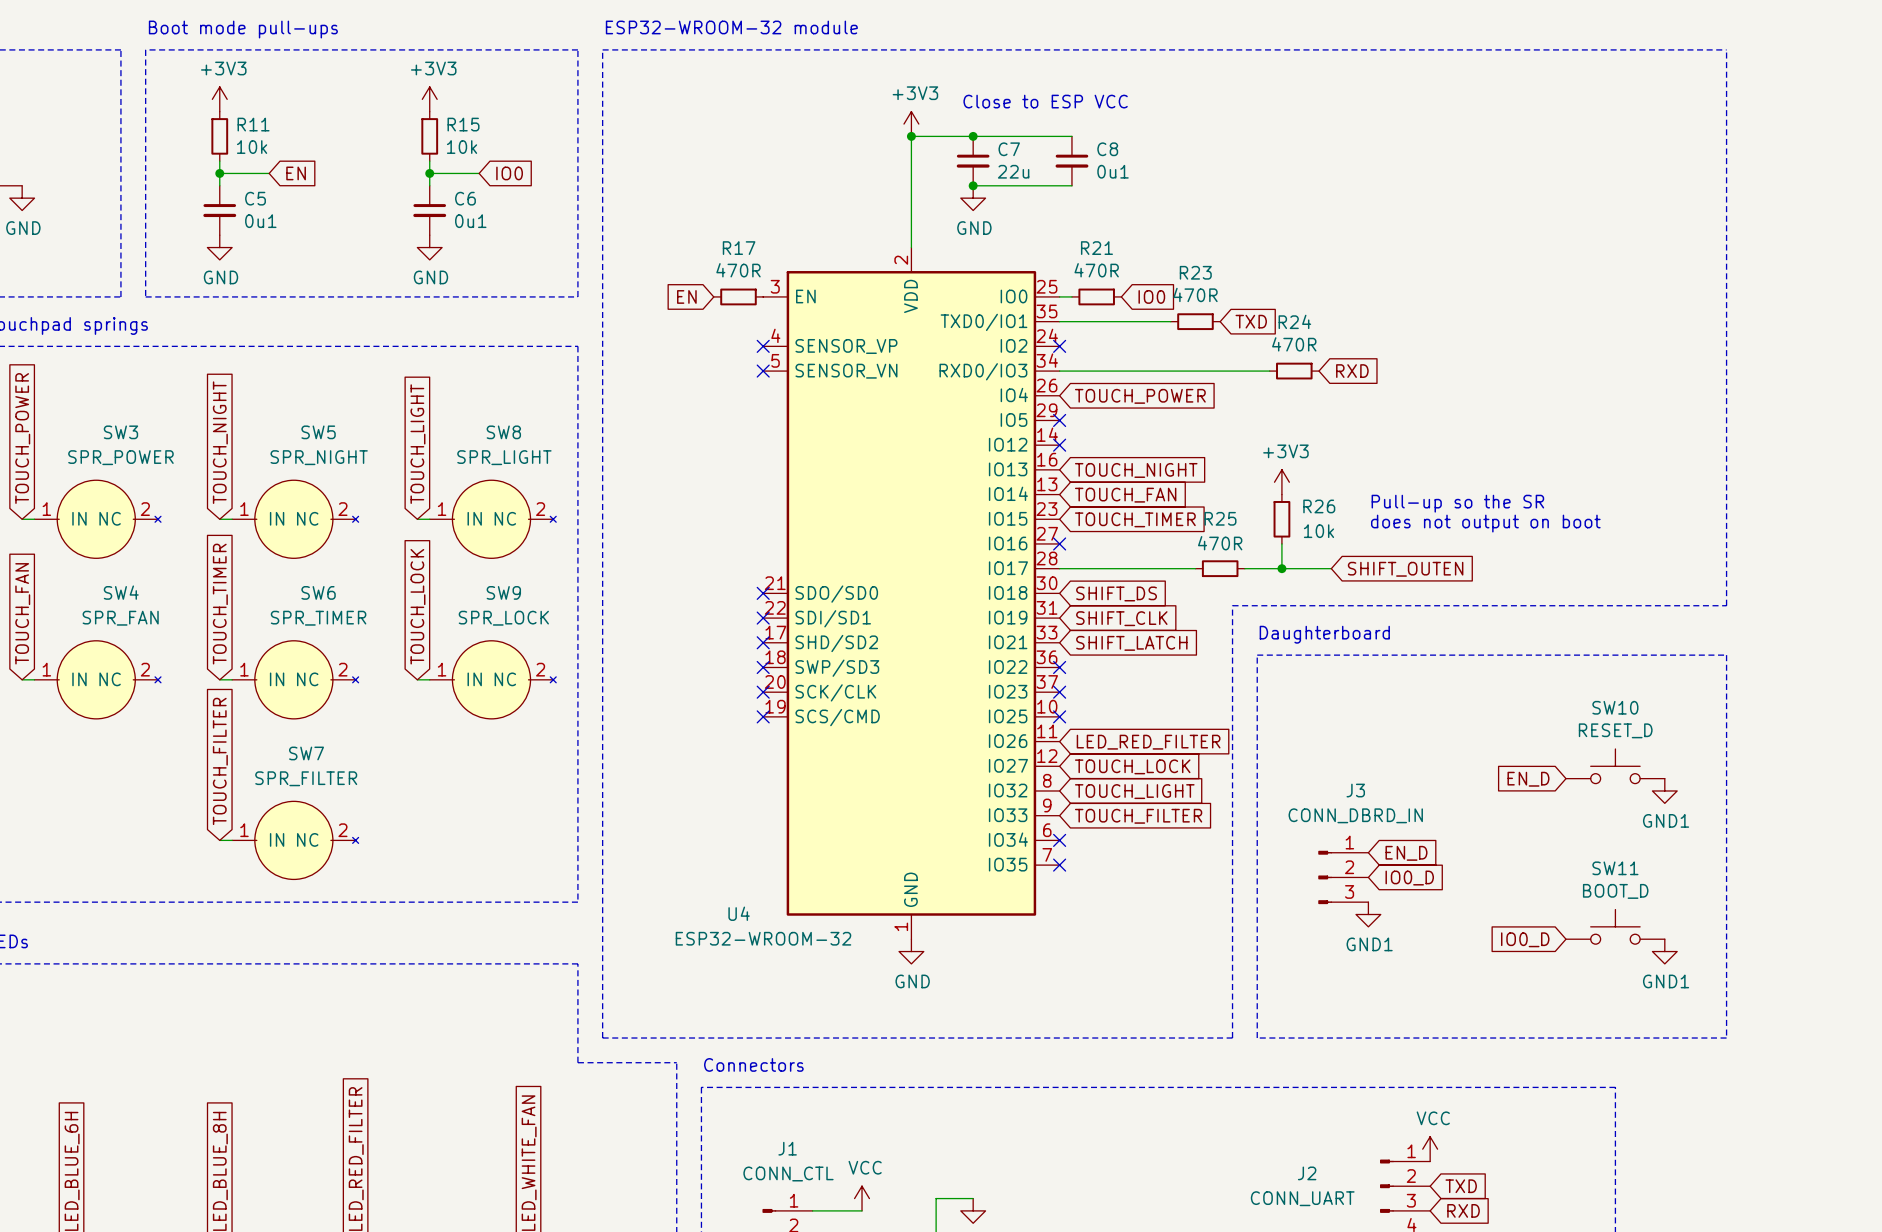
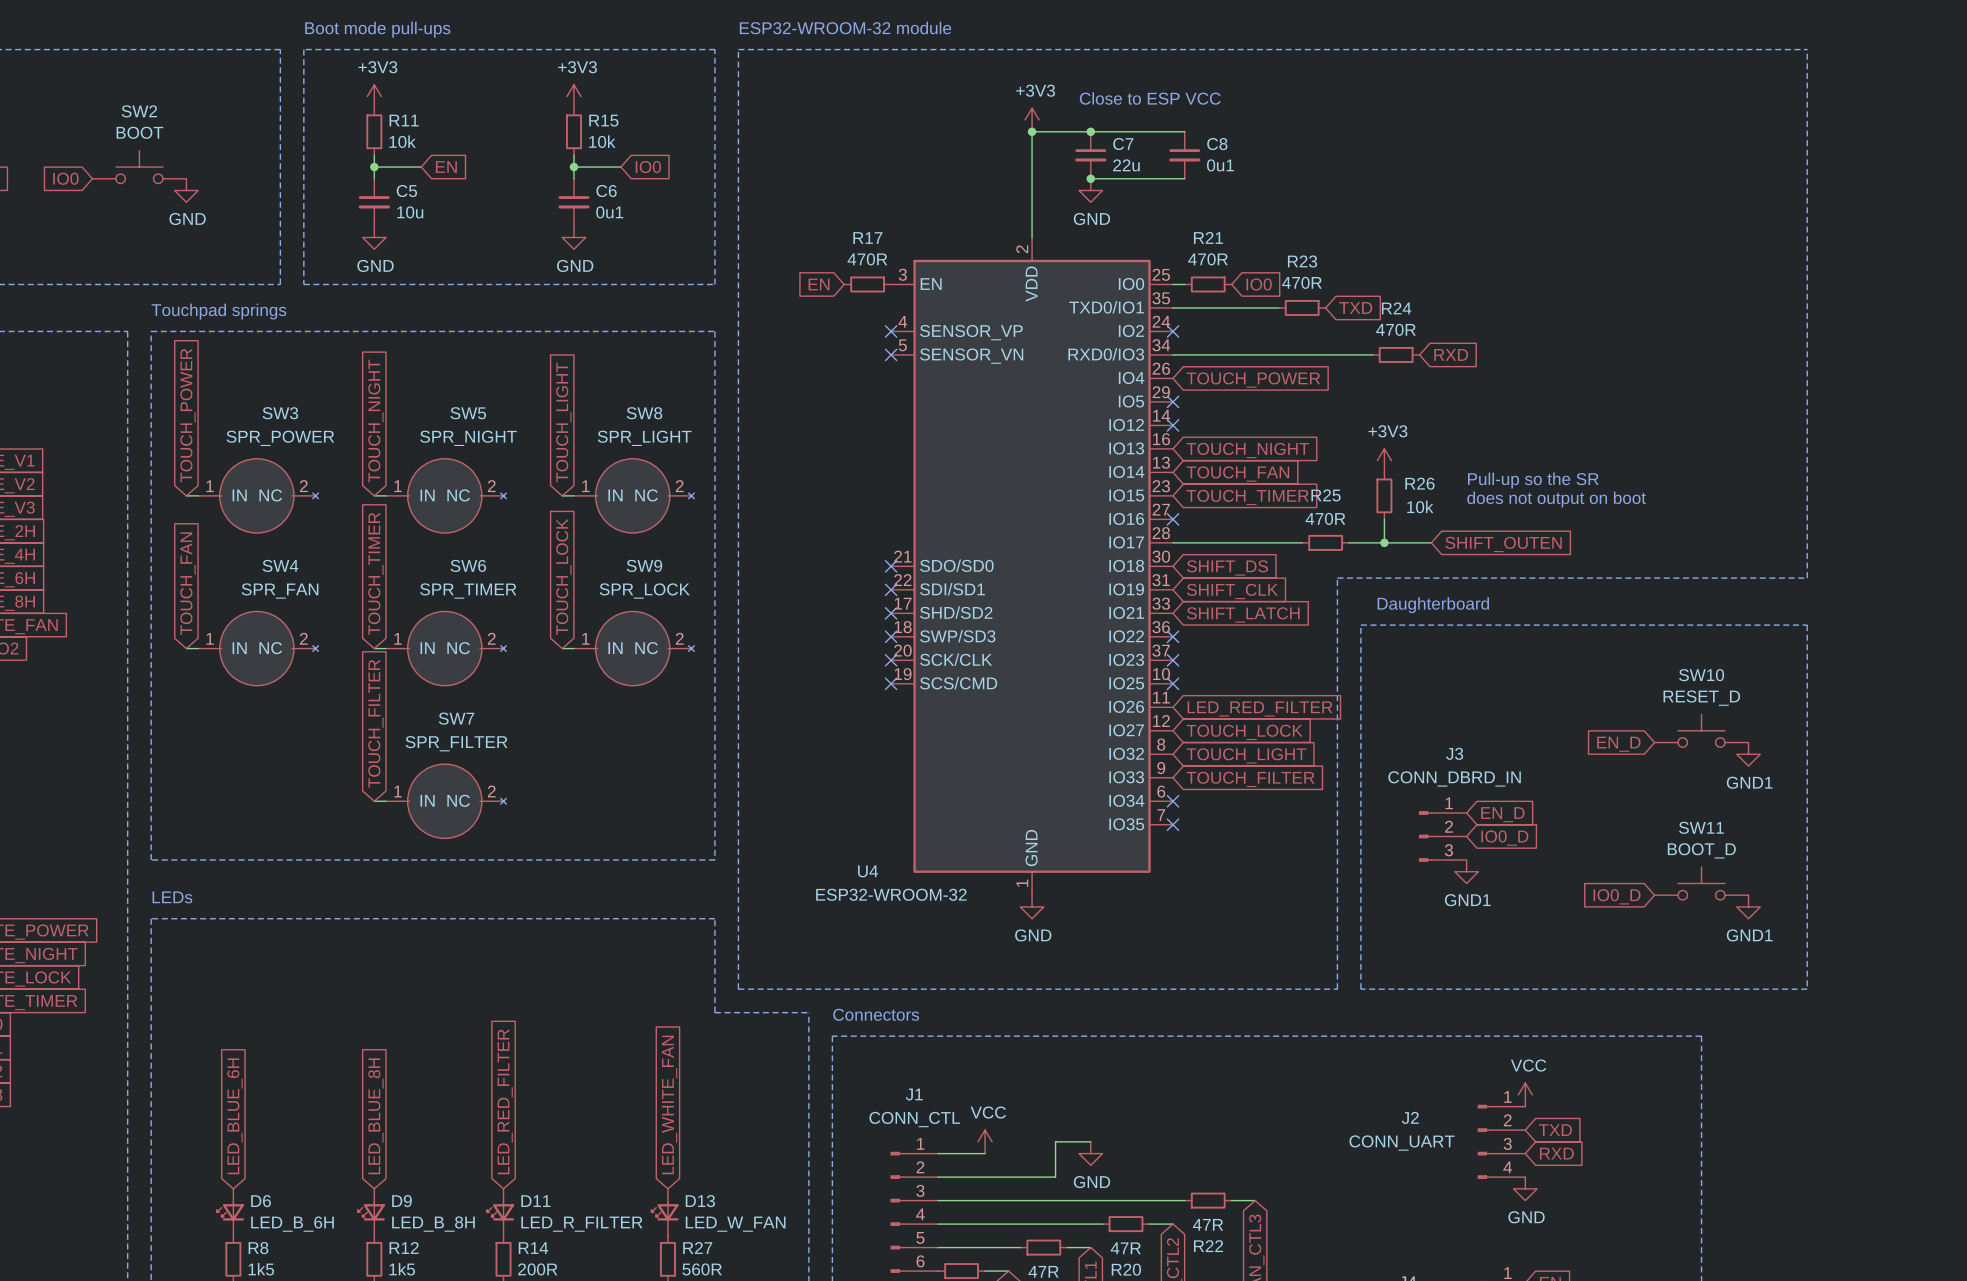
C5 value: 0u1 (260, 221) -> 10u (410, 212)

